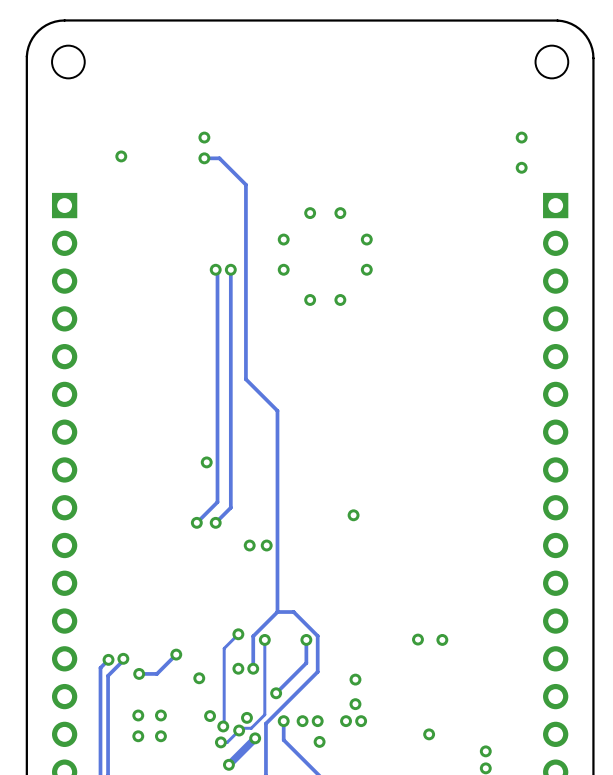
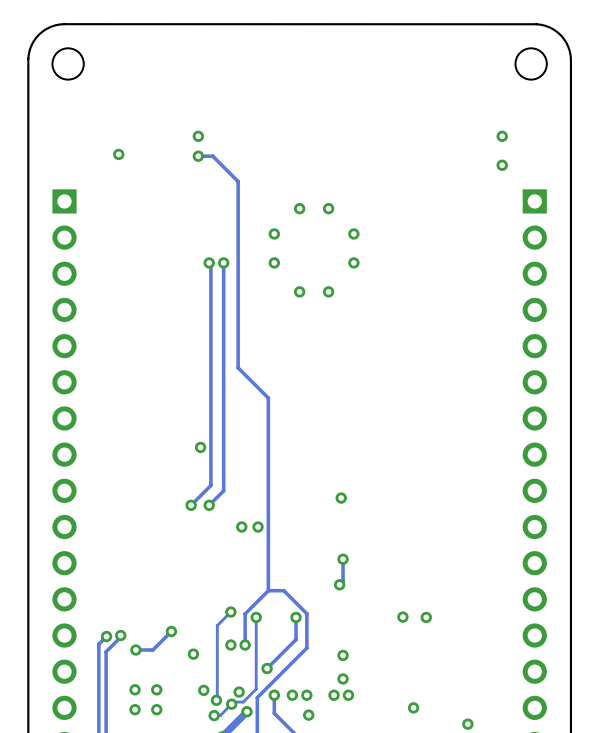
track: none -> (343, 559) (343, 581) (339, 584)
via: none -> (343, 559)
via: none -> (339, 584)

